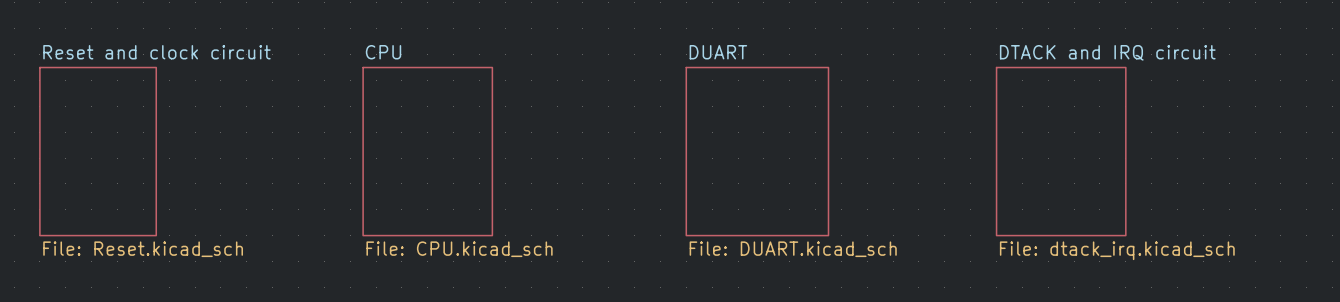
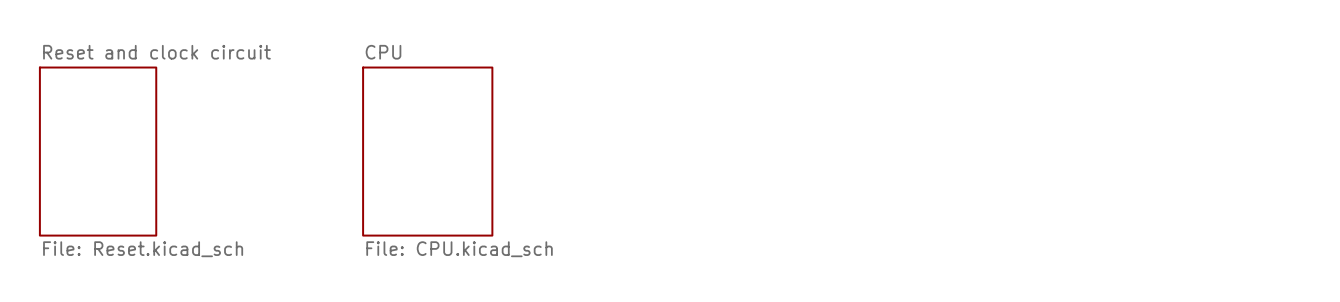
sheet DUART: File: DUART.kicad_sch (757, 151) -> none
sheet DTACK and IRQ circuit: File: dtack_irq.kicad_sch (1061, 151) -> none

